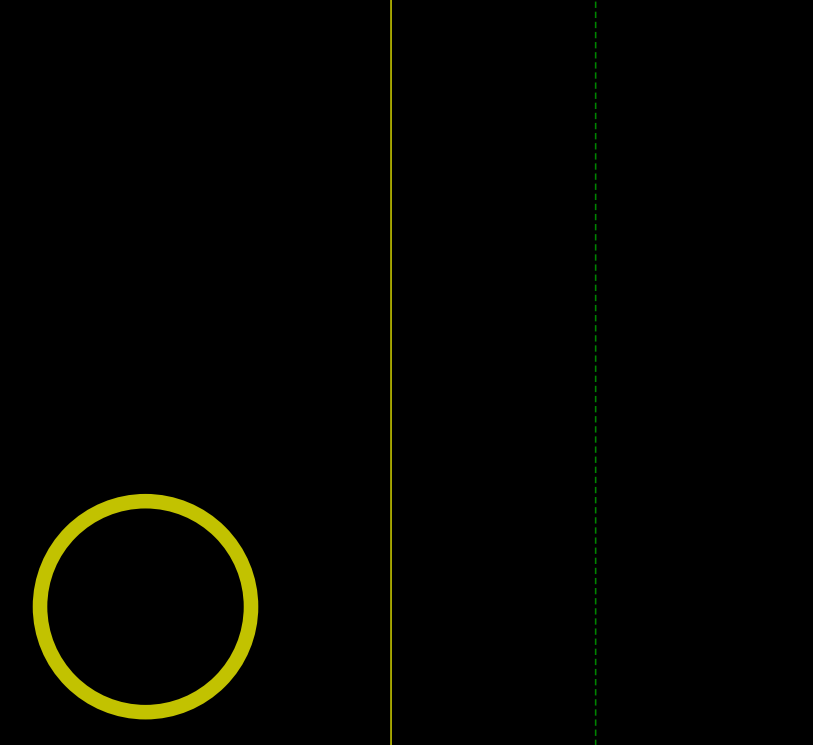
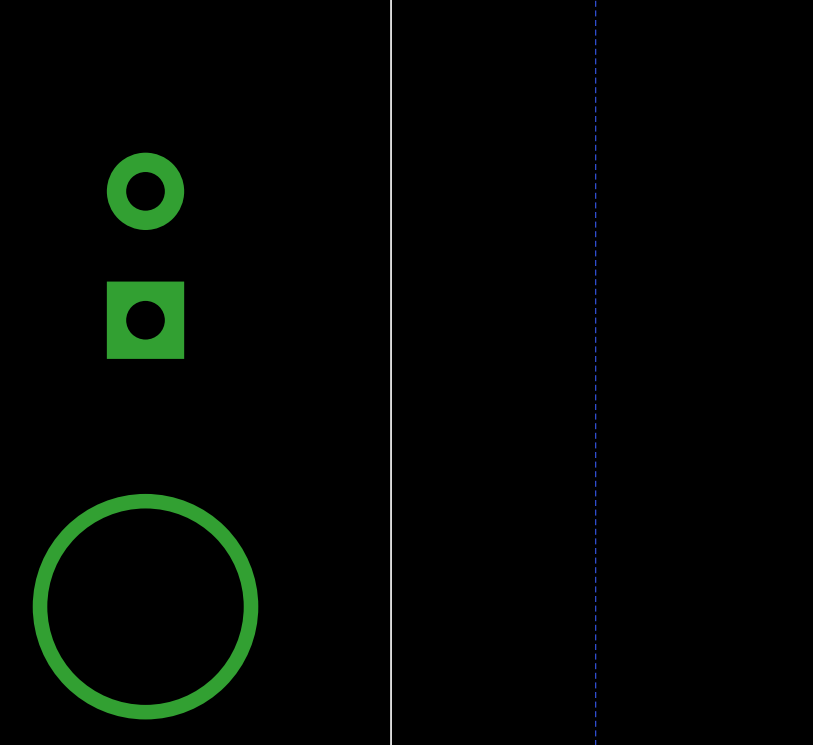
part: none -> (145, 255)

